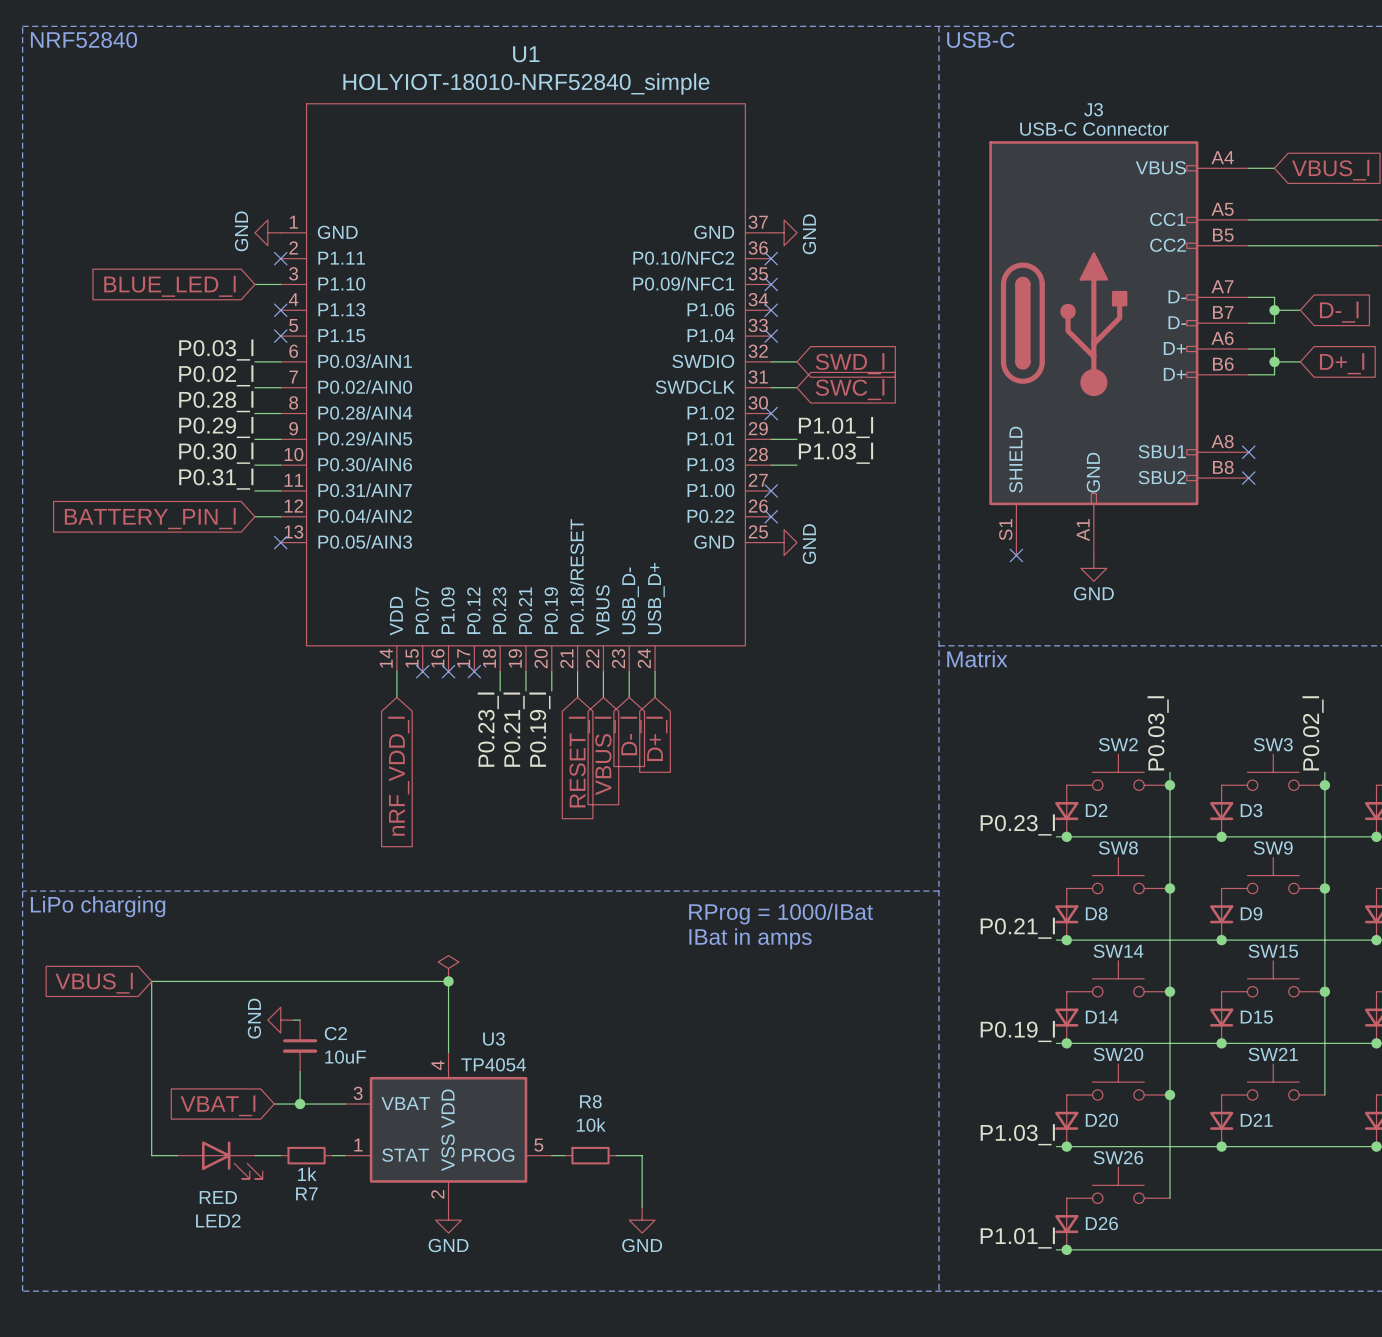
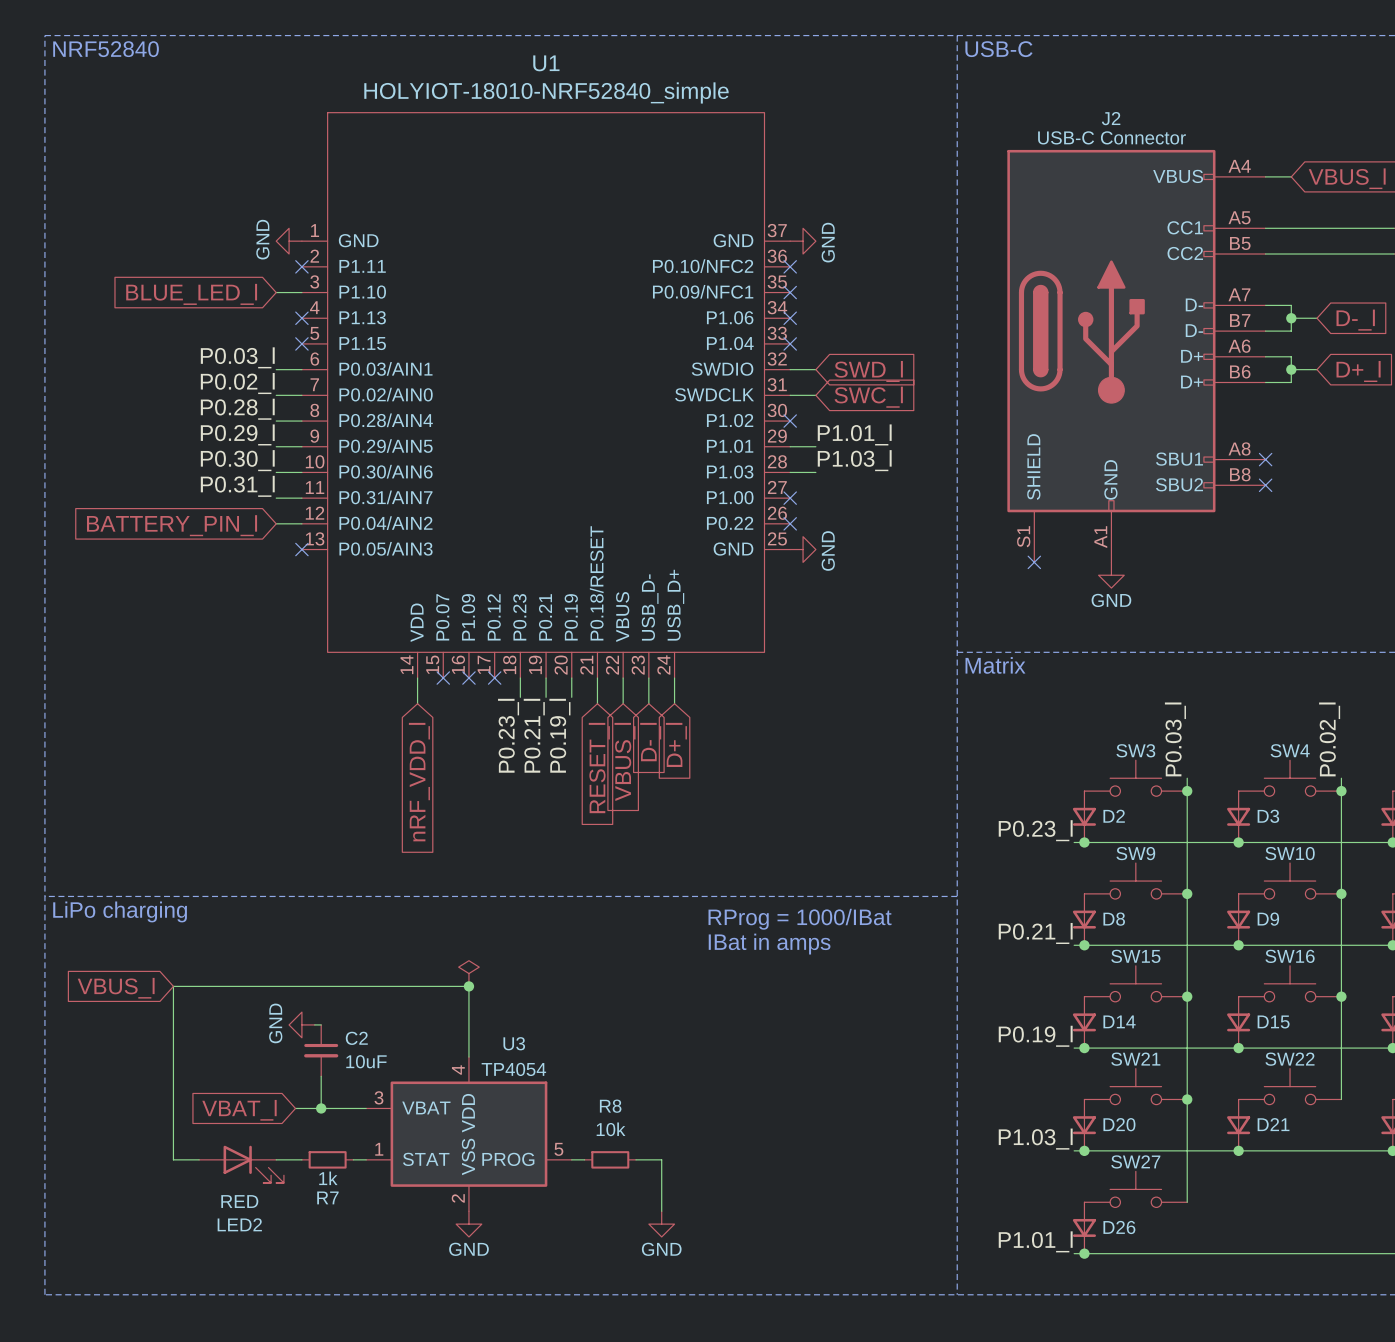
J3 name: J3 (1093, 109) -> J2 (1111, 118)
SW2 name: SW2 (1118, 744) -> SW3 (1135, 750)
SW3 name: SW3 (1273, 744) -> SW4 (1290, 750)
SW8 name: SW8 (1118, 847) -> SW9 (1135, 853)
SW9 name: SW9 (1273, 847) -> SW10 (1290, 853)
SW14 name: SW14 (1118, 951) -> SW15 (1135, 956)
SW15 name: SW15 (1273, 951) -> SW16 (1290, 956)
SW20 name: SW20 (1118, 1054) -> SW21 (1135, 1059)
SW21 name: SW21 (1273, 1054) -> SW22 (1289, 1059)
SW26 name: SW26 (1118, 1157) -> SW27 (1135, 1161)

